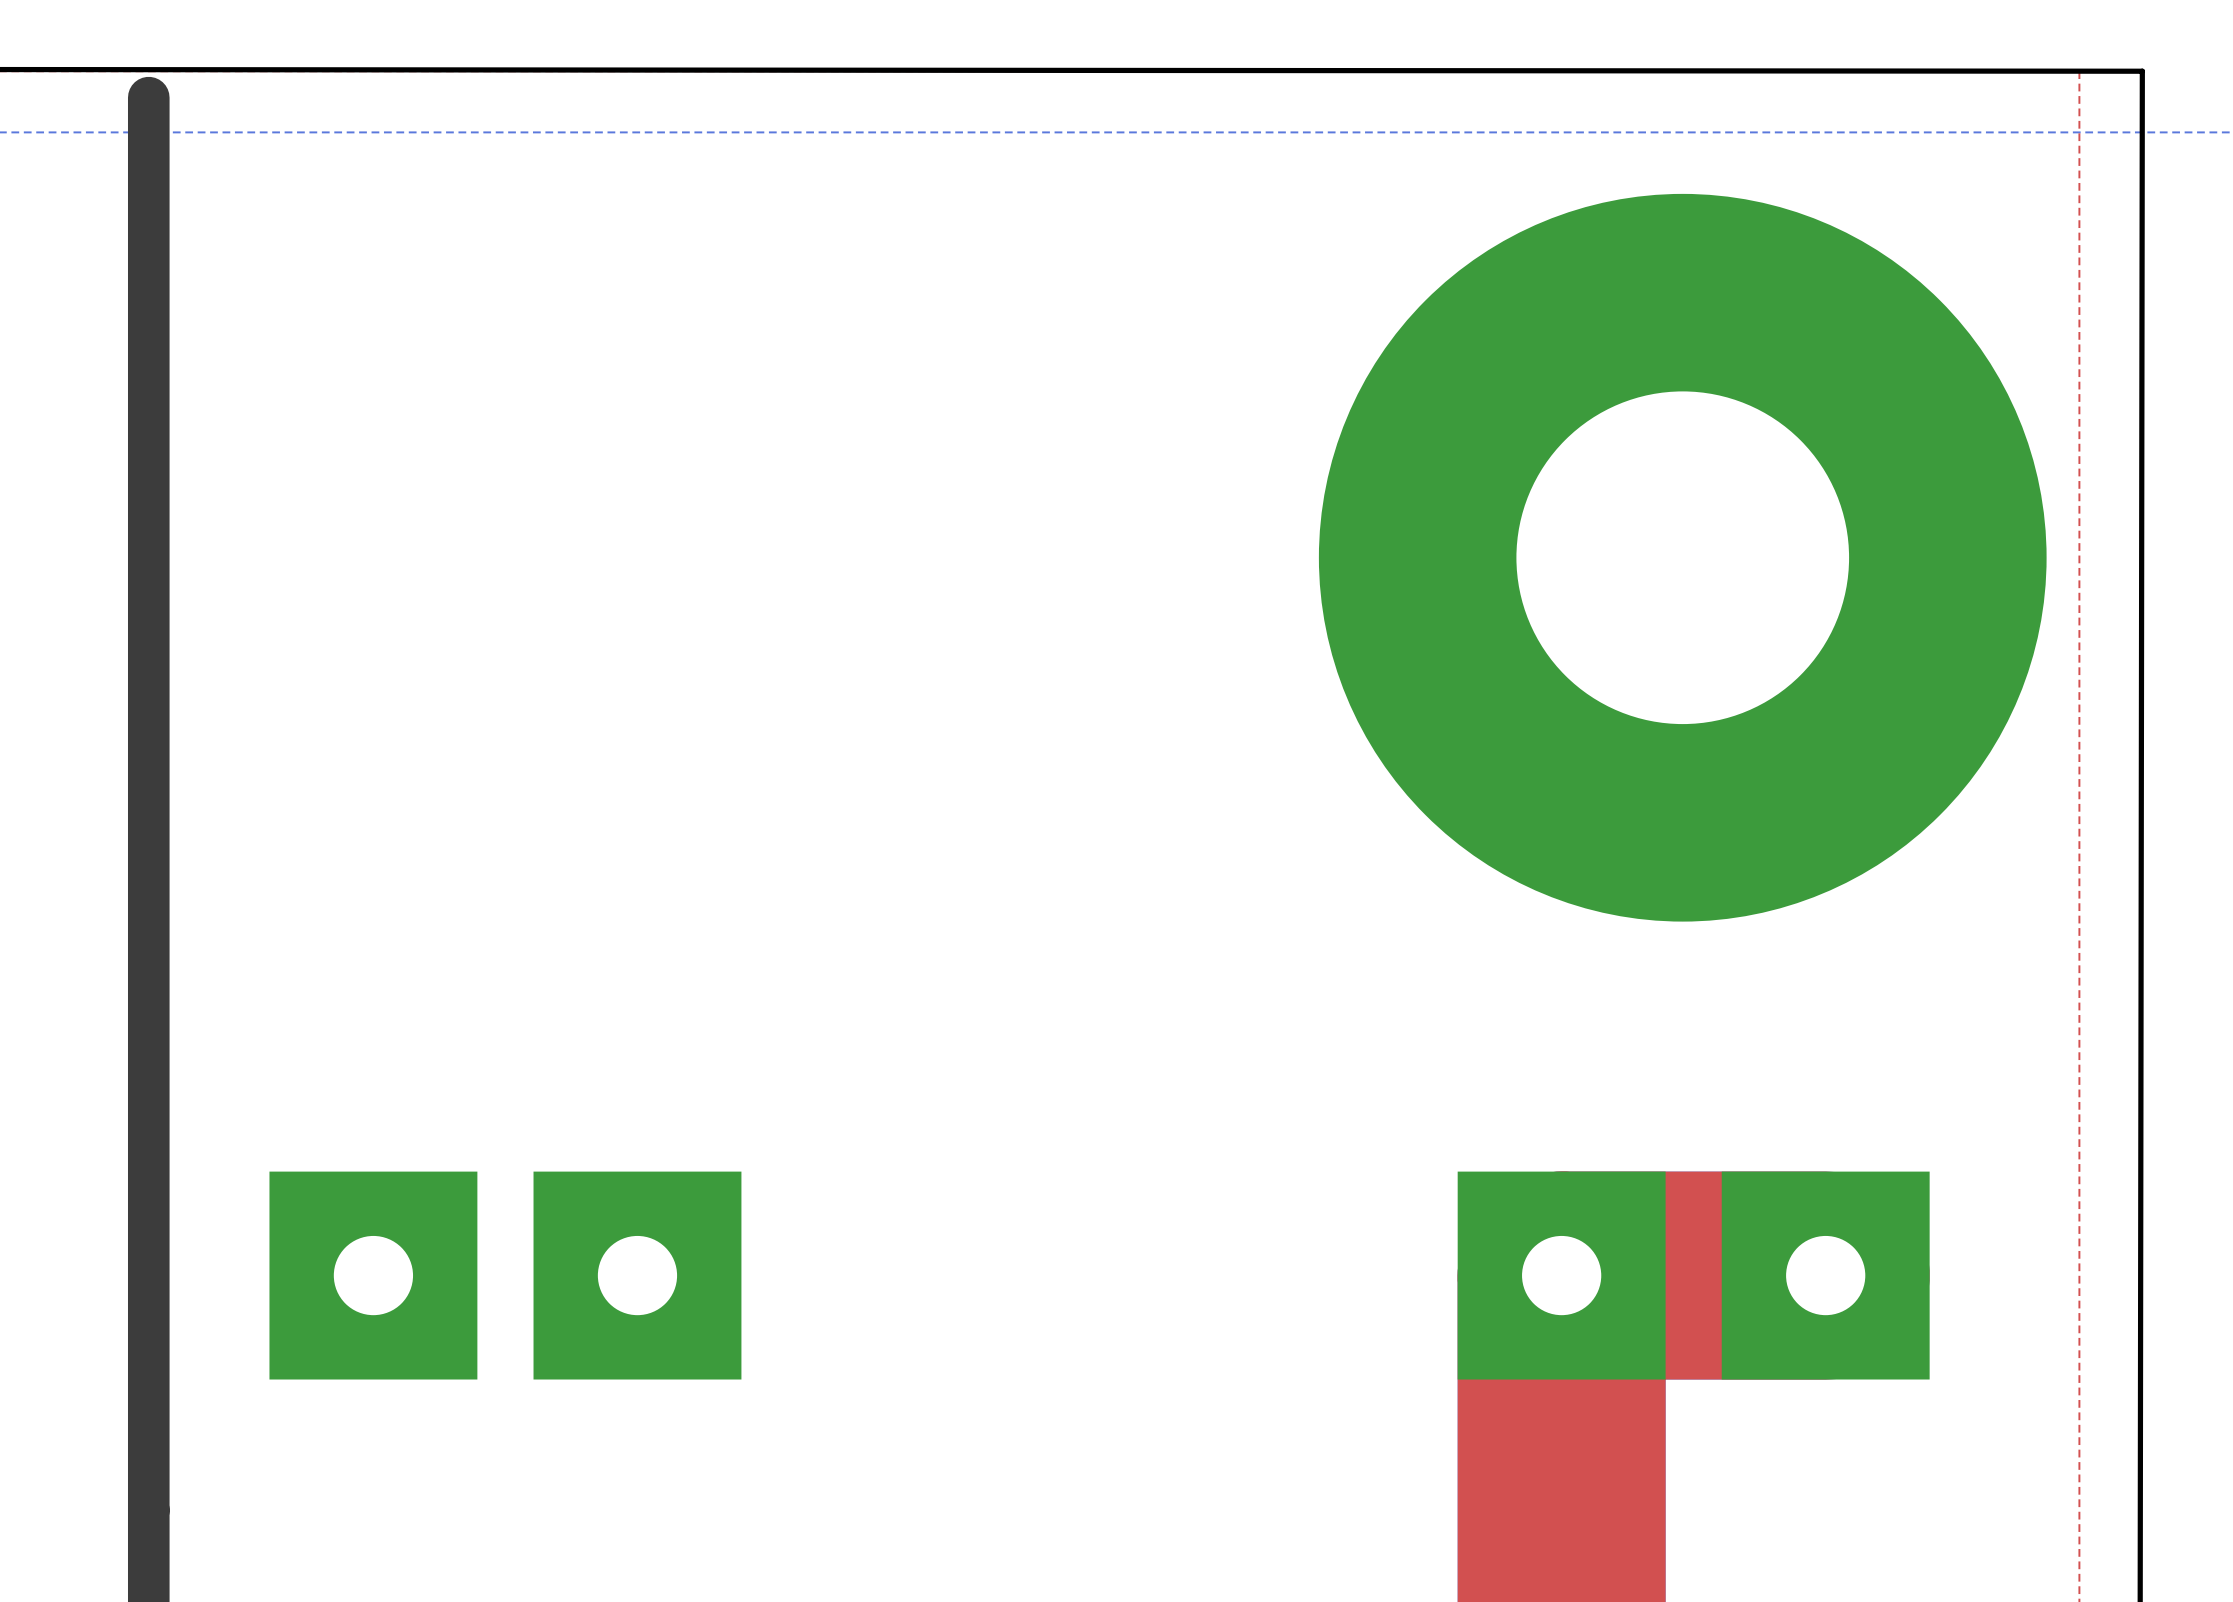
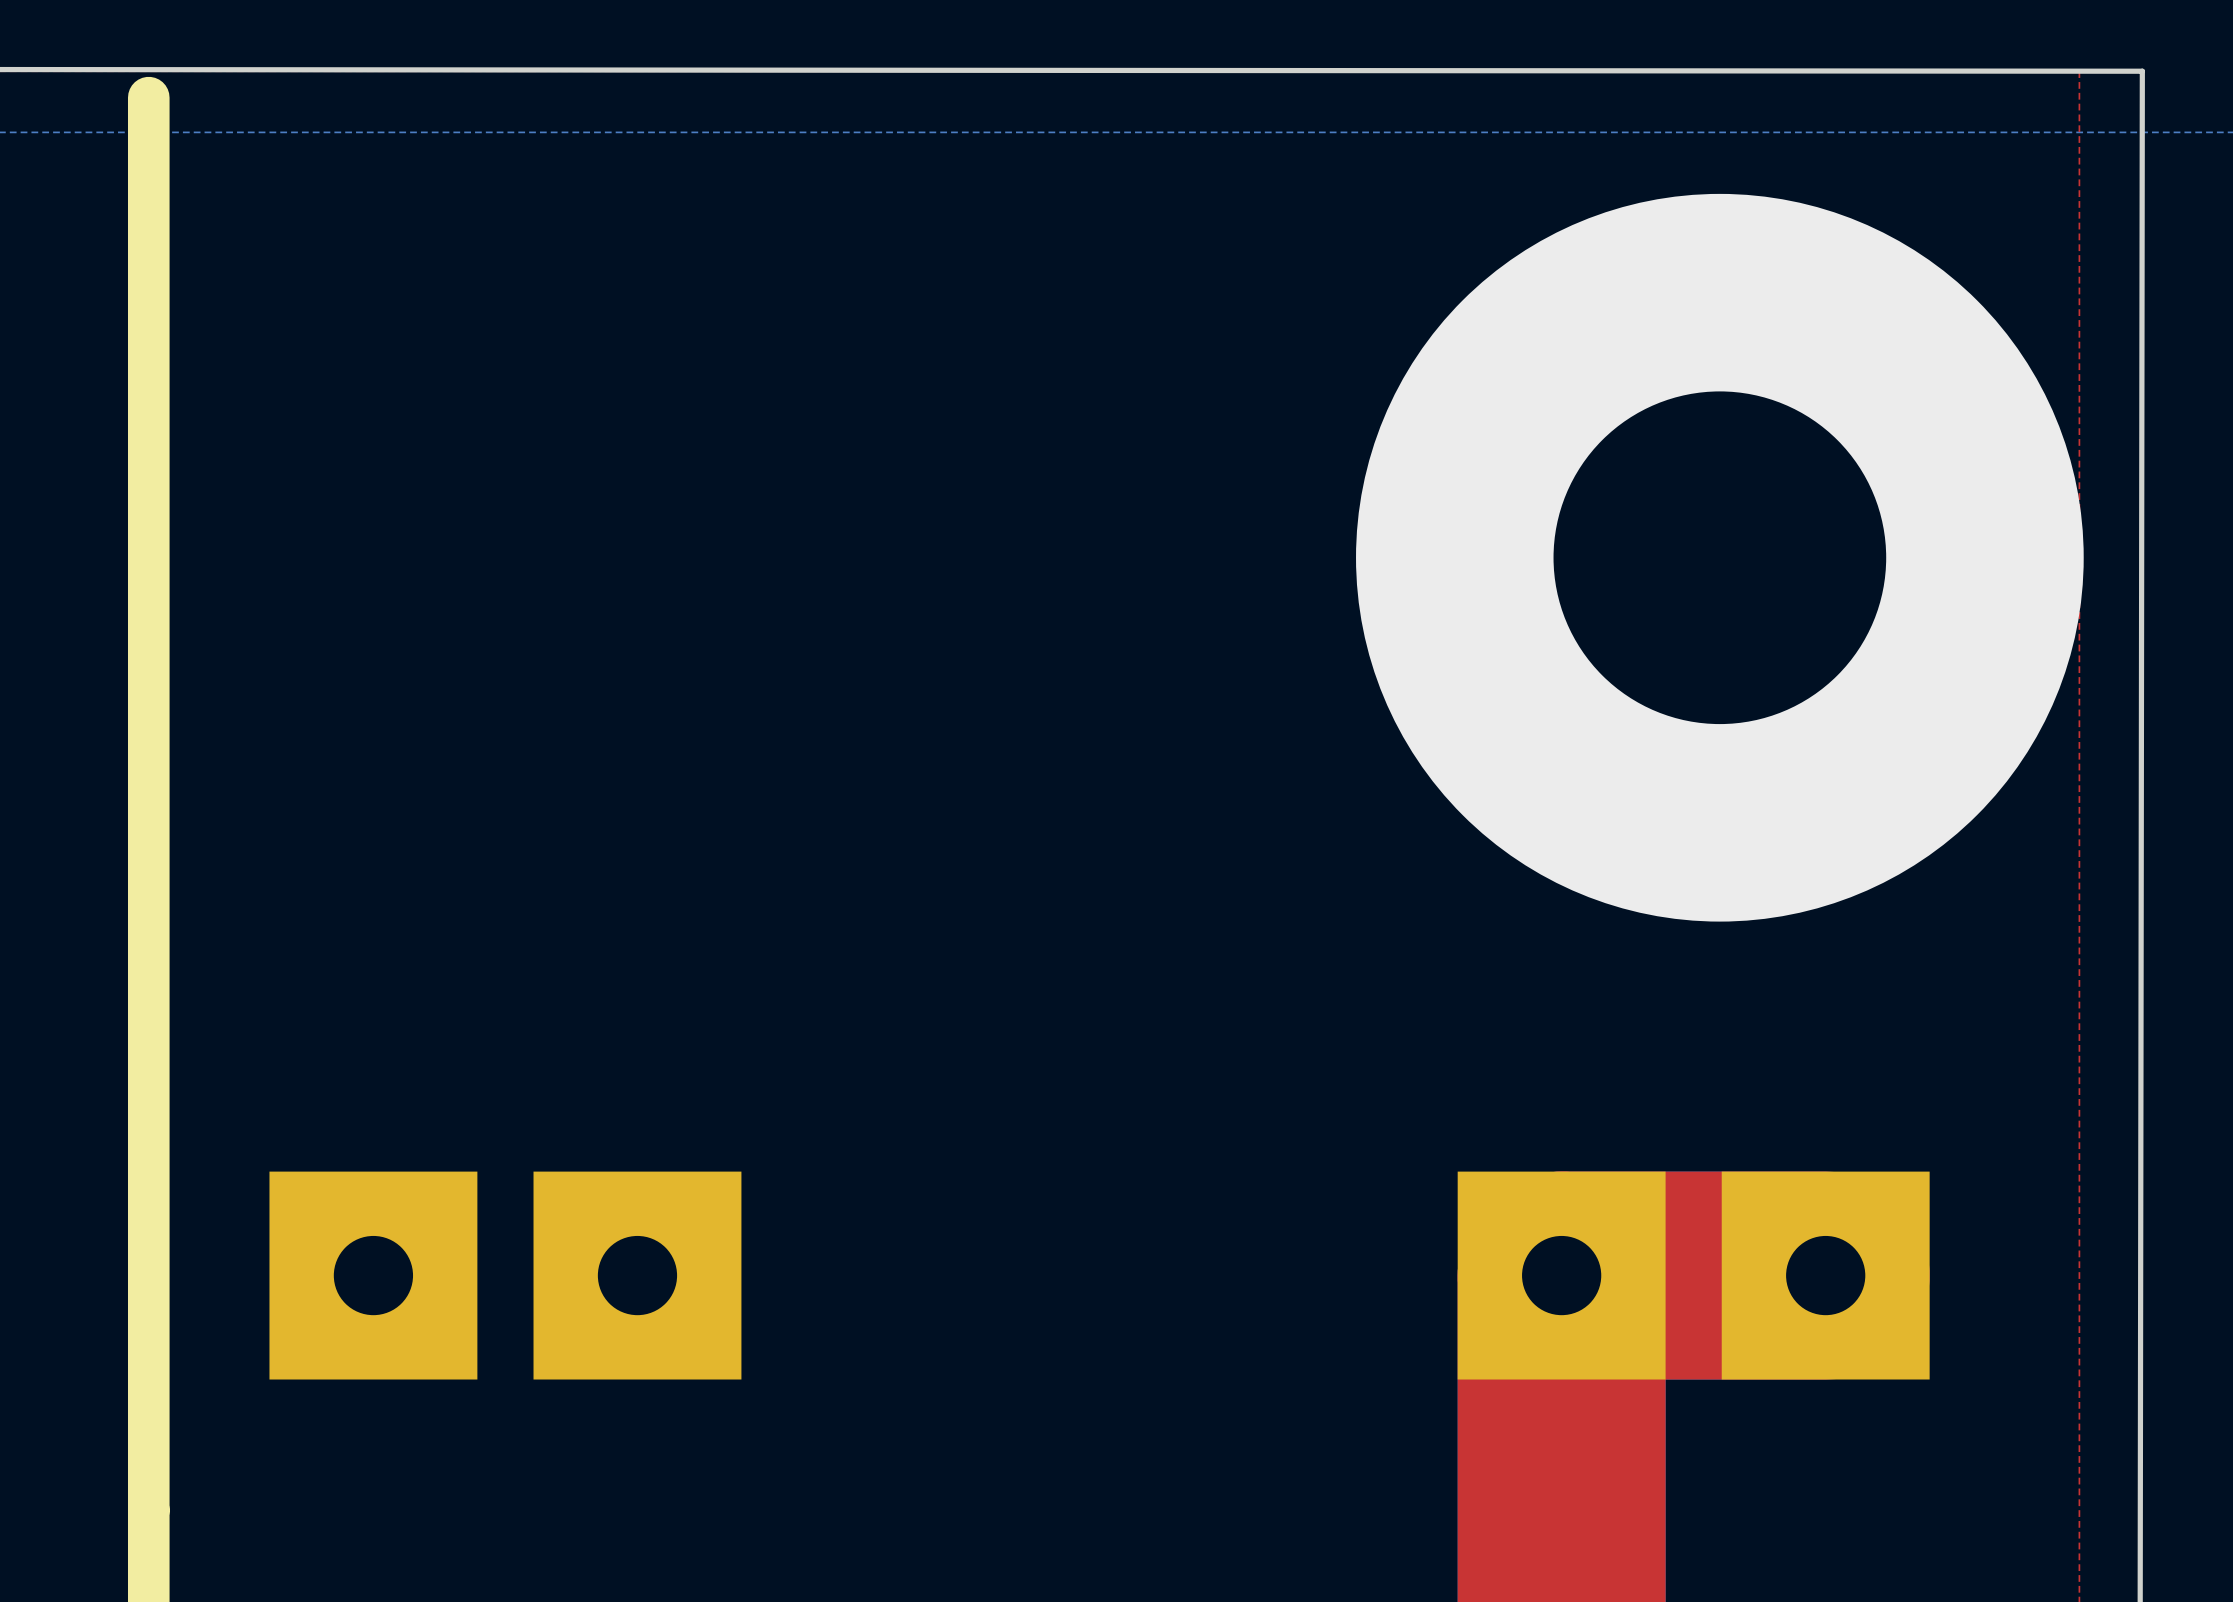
via position: (1682, 557) -> (1719, 557)

